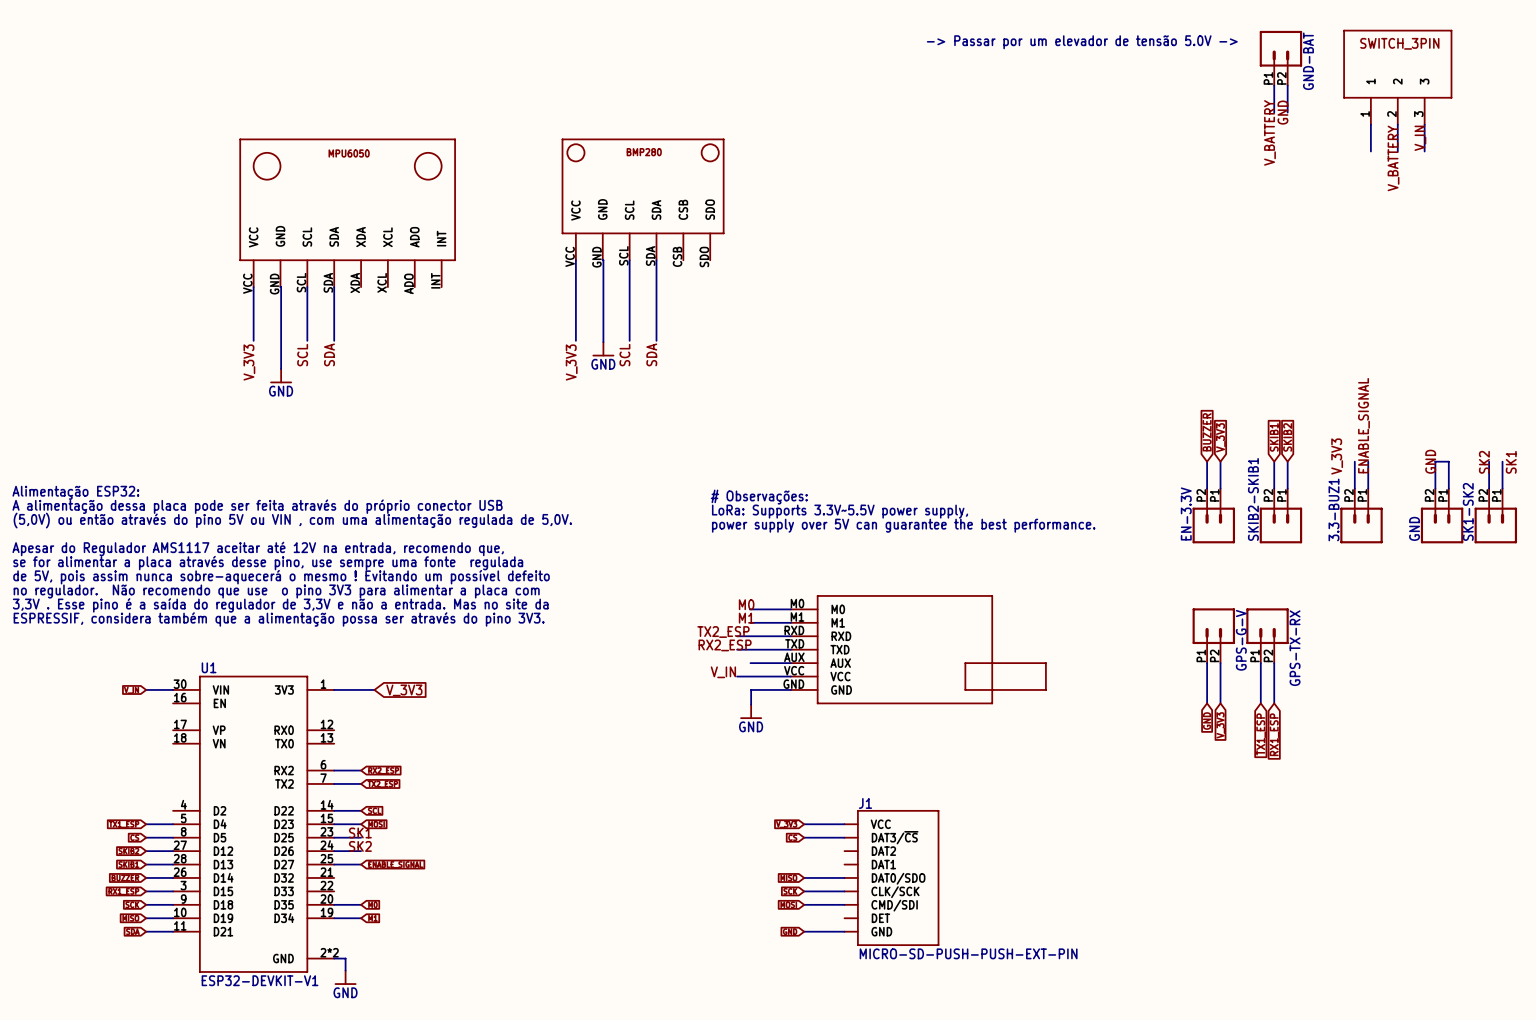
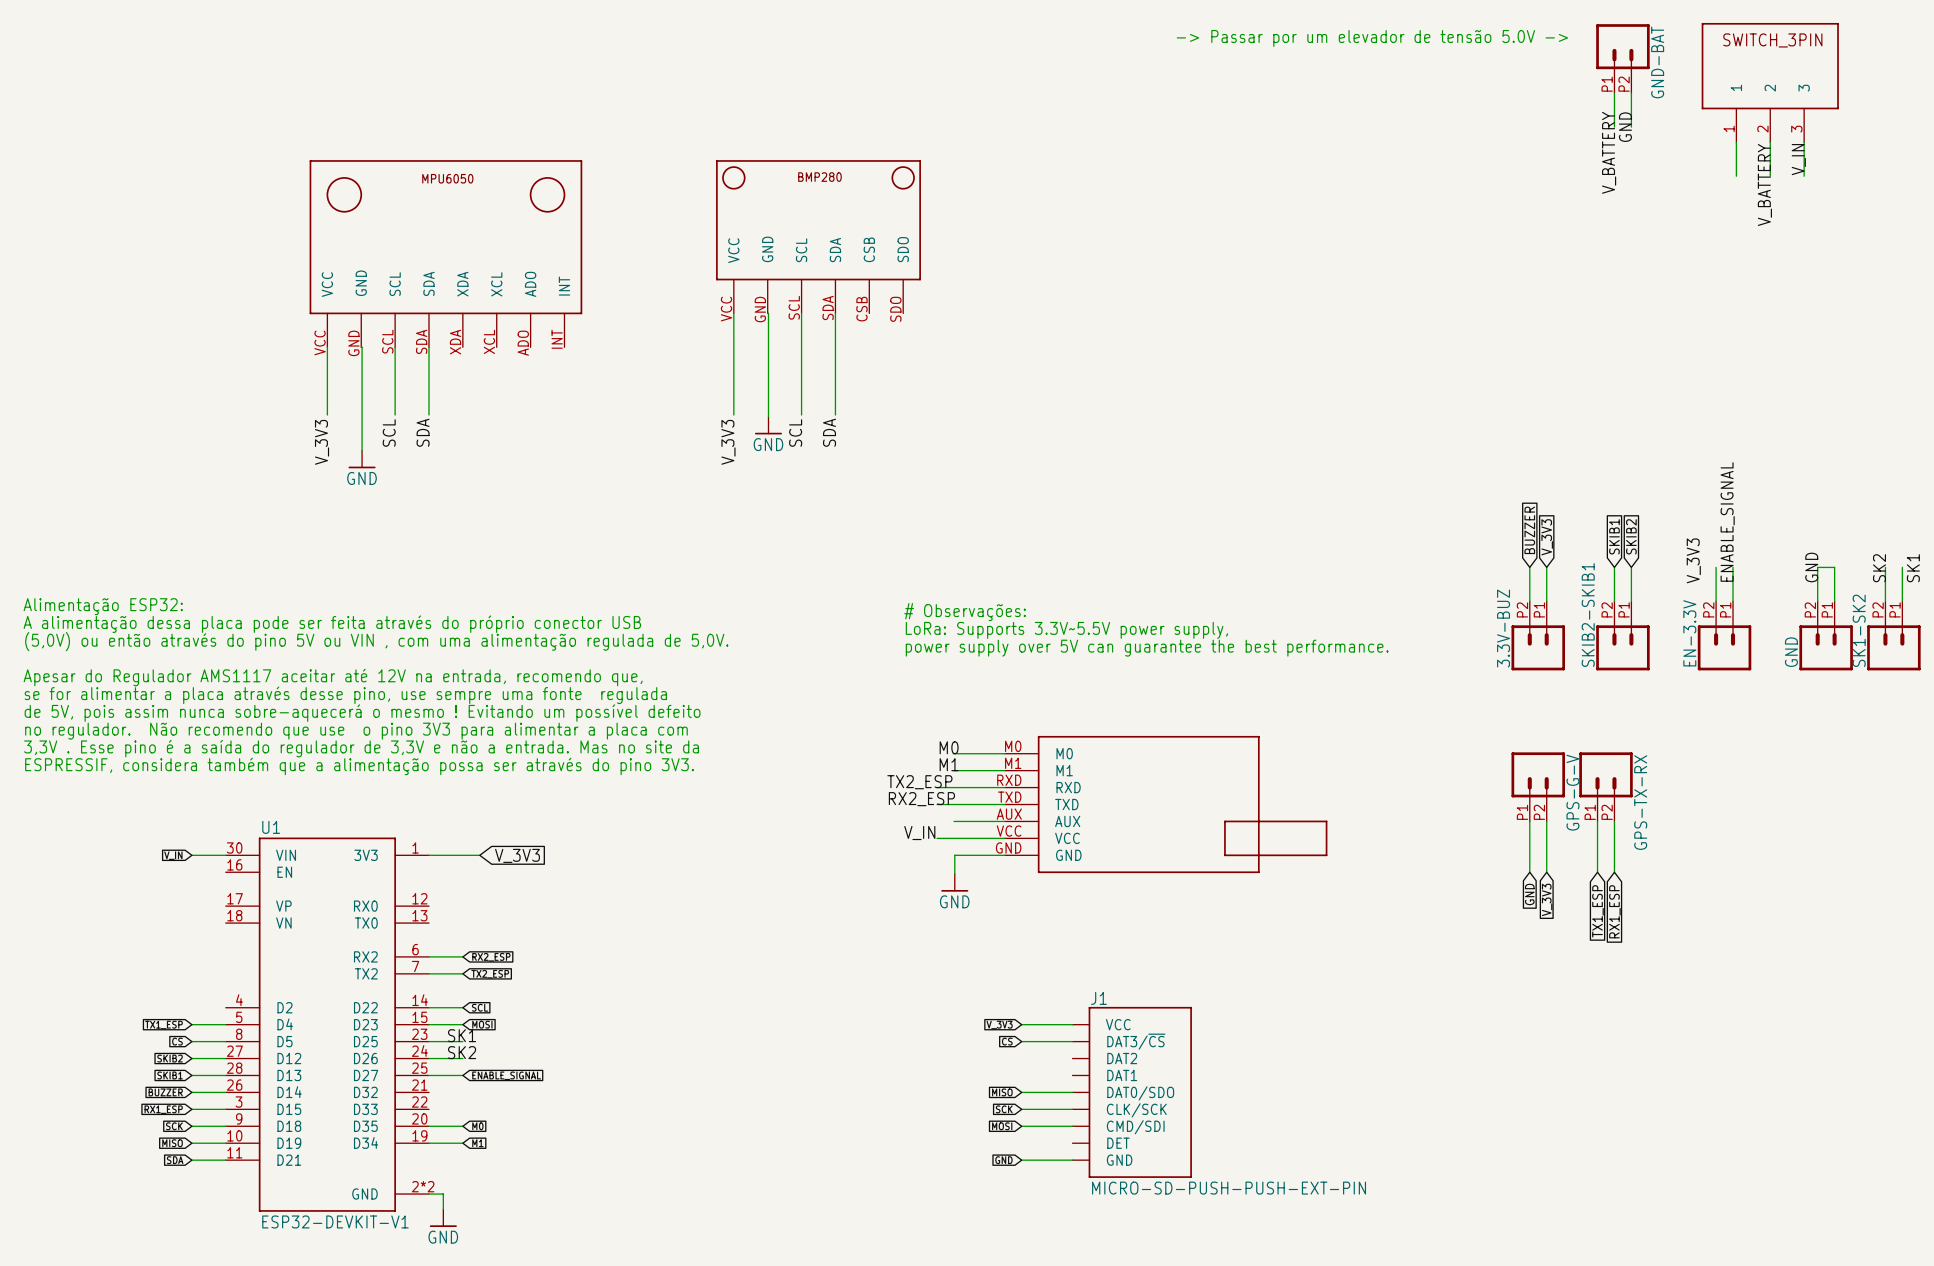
3.3-BUZ1 name: 3.3-BUZ1 (1333, 509) -> EN-3.3V (1689, 633)
EN-3.3V name: EN-3.3V (1186, 513) -> 3.3V-BUZ (1503, 628)

